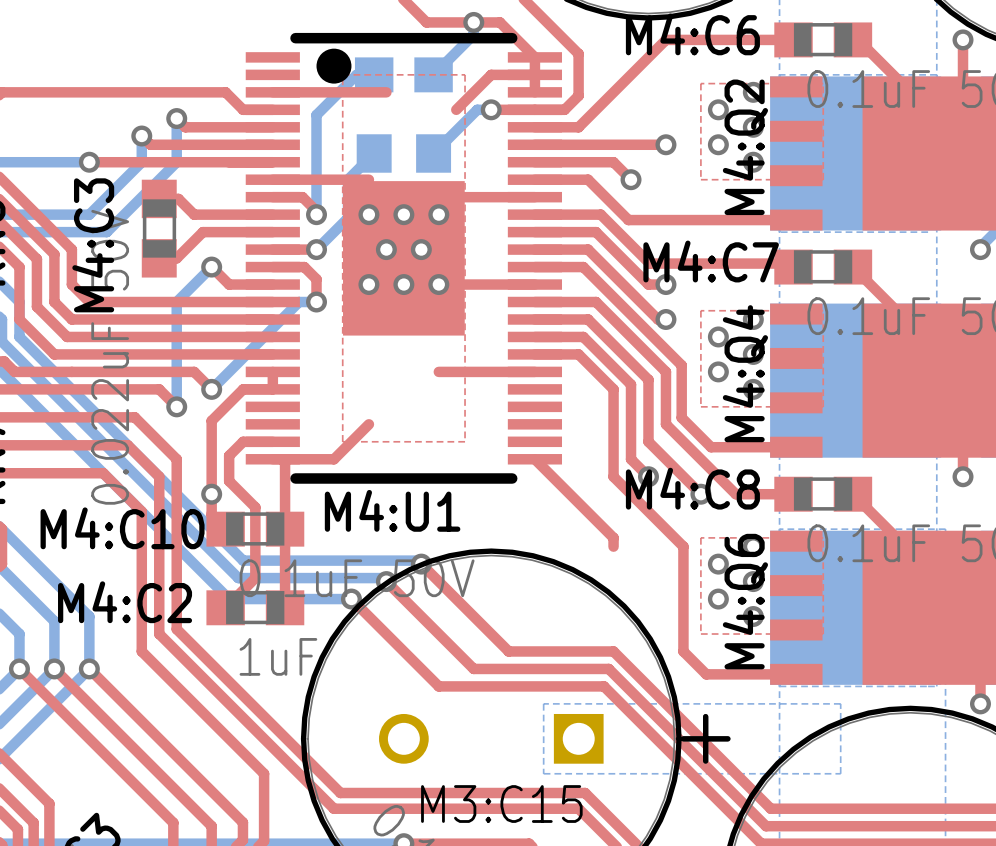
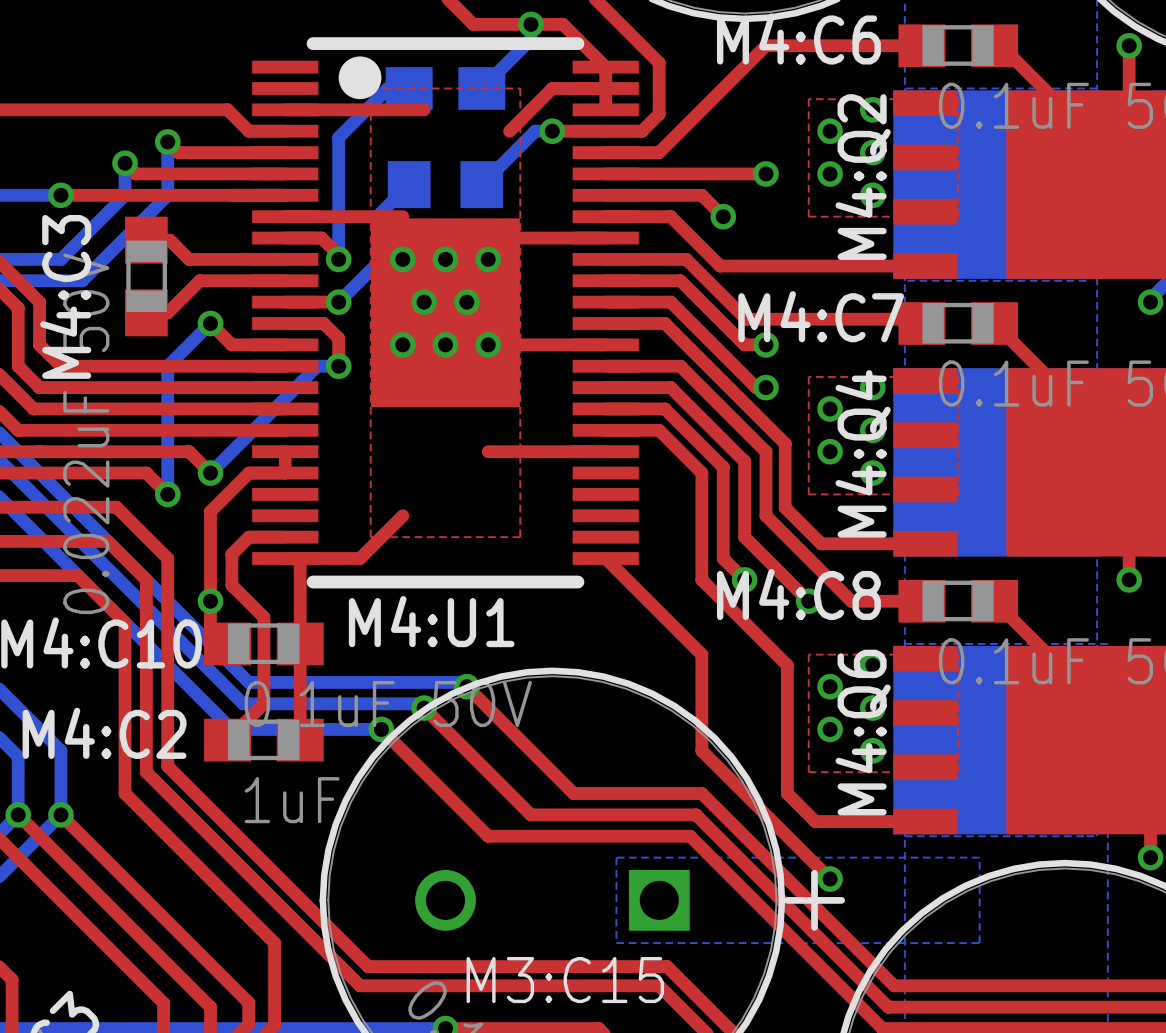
top track: none -> (701, 665) (701, 750) (830, 878)
via: none -> (830, 878)

